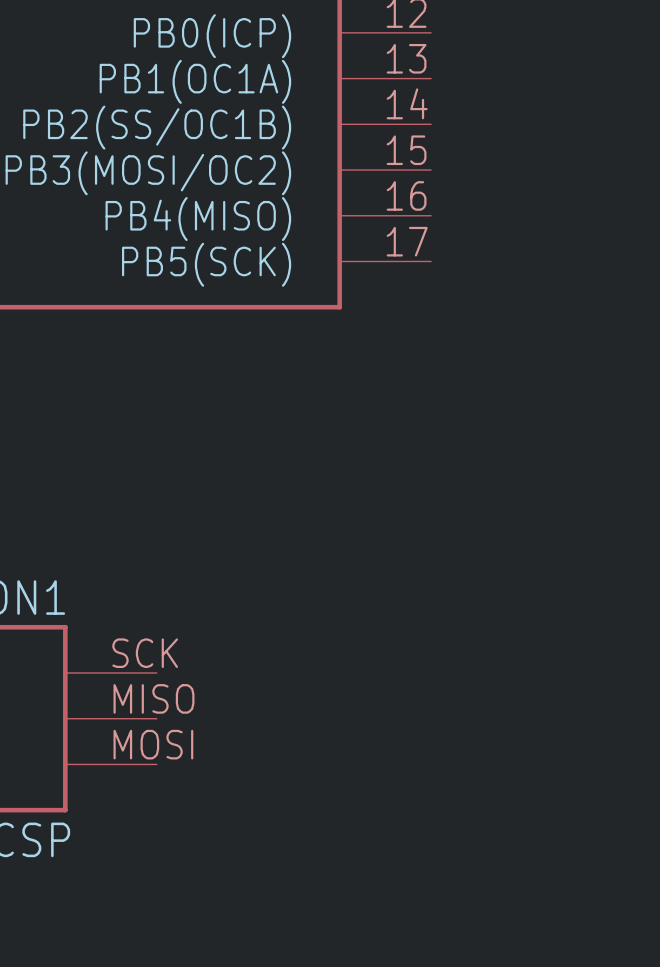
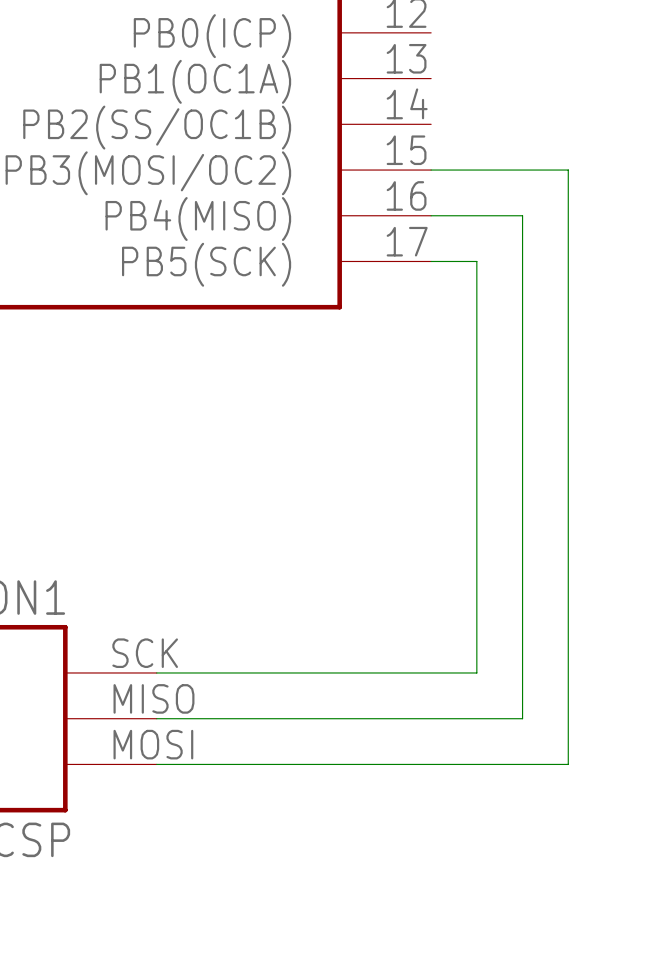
wire: none -> (431, 170) (568, 170) (568, 764) (156, 764)
wire: none -> (431, 215) (522, 215) (522, 718) (156, 718)
wire: none -> (431, 261) (476, 261) (476, 672) (156, 672)

